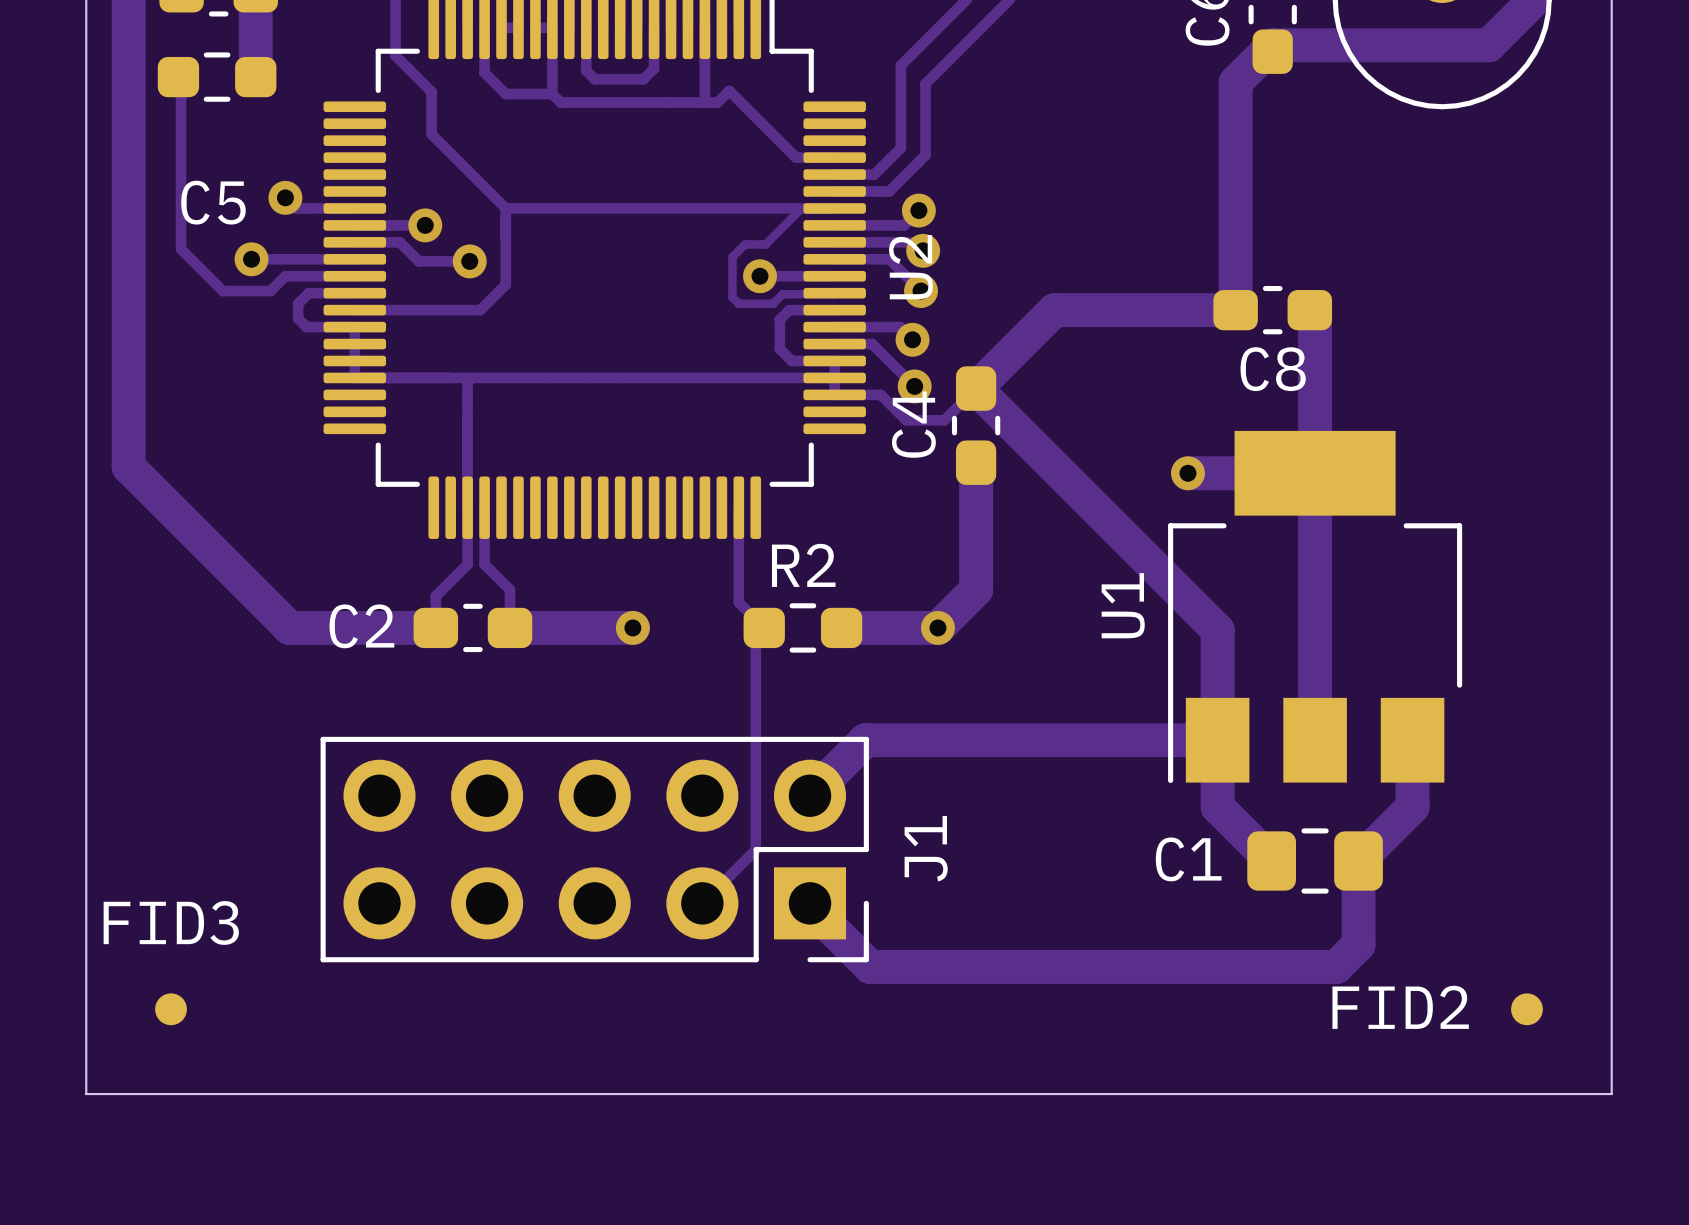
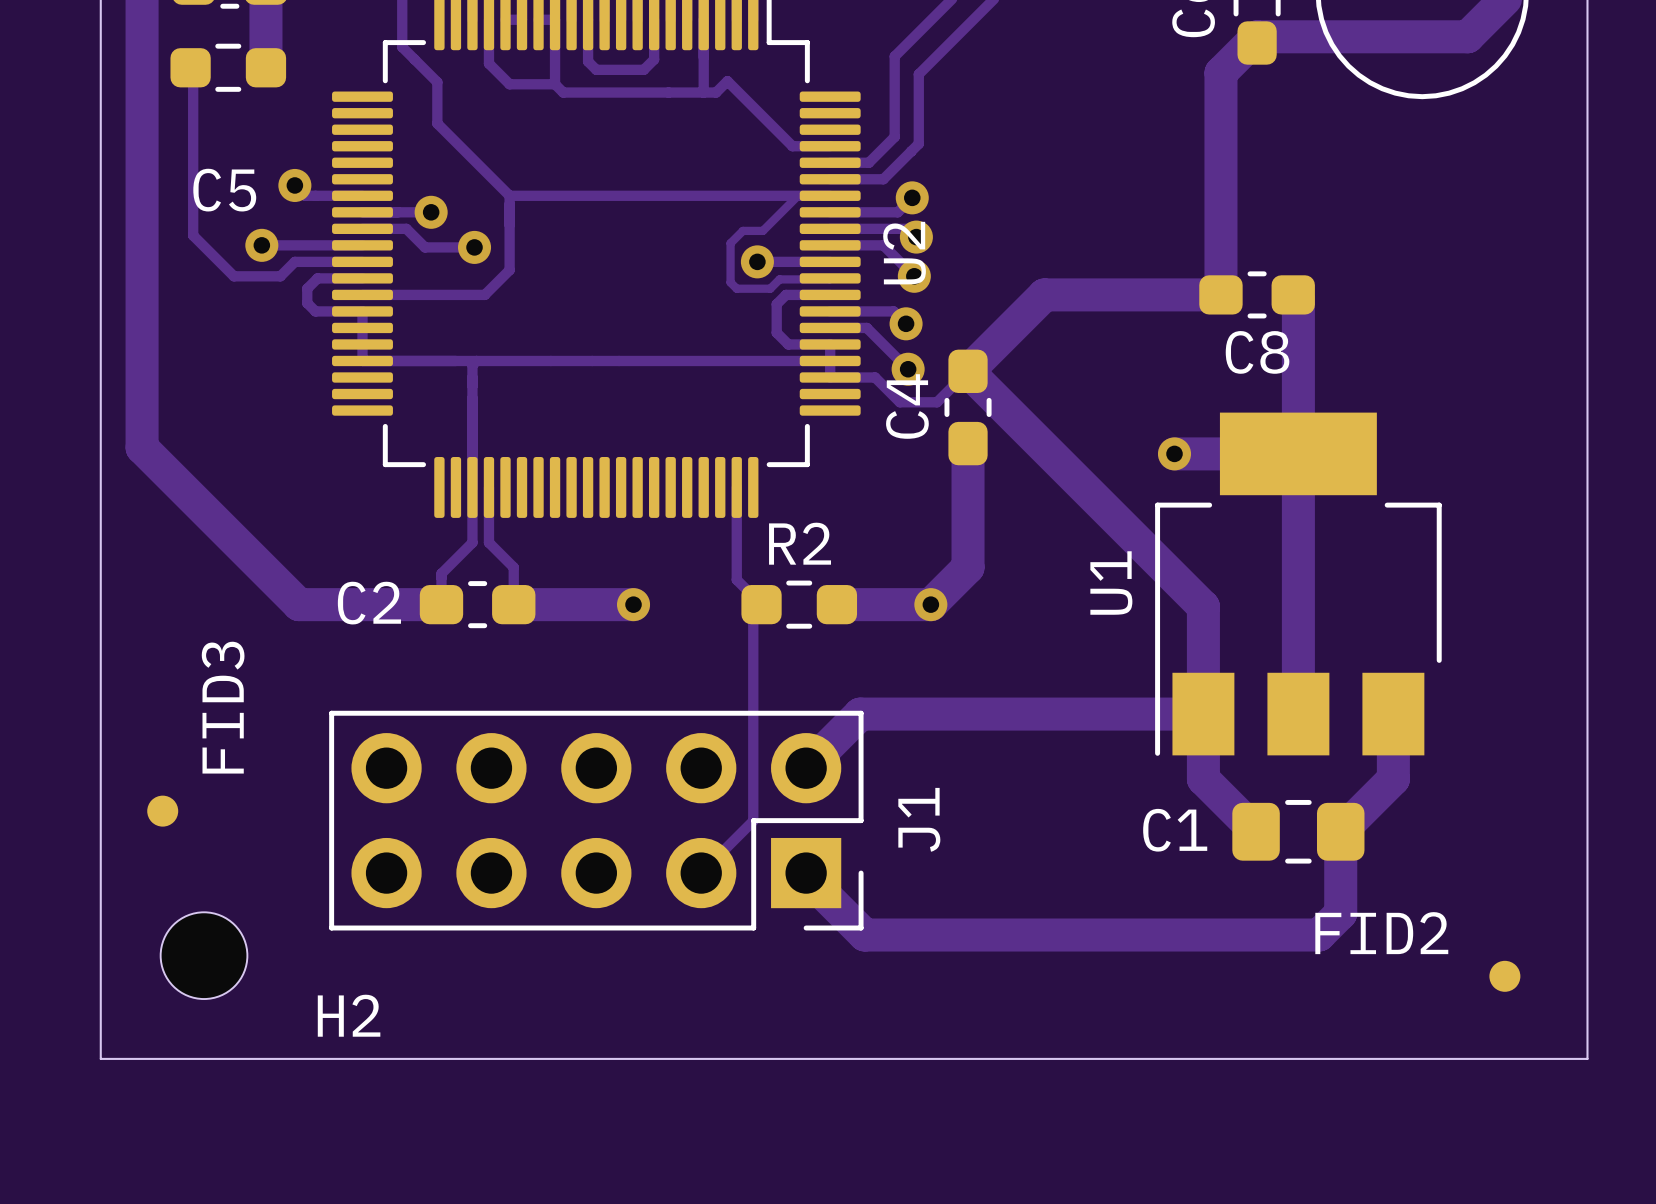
FID3 name rotation: 0° (171, 922) -> 90° counterclockwise (223, 707)
H2: none -> (204, 955)
FID2 name position: FID2 (1400, 1007) -> FID2 (1381, 933)
FID3 position: (171, 1009) -> (162, 811)

